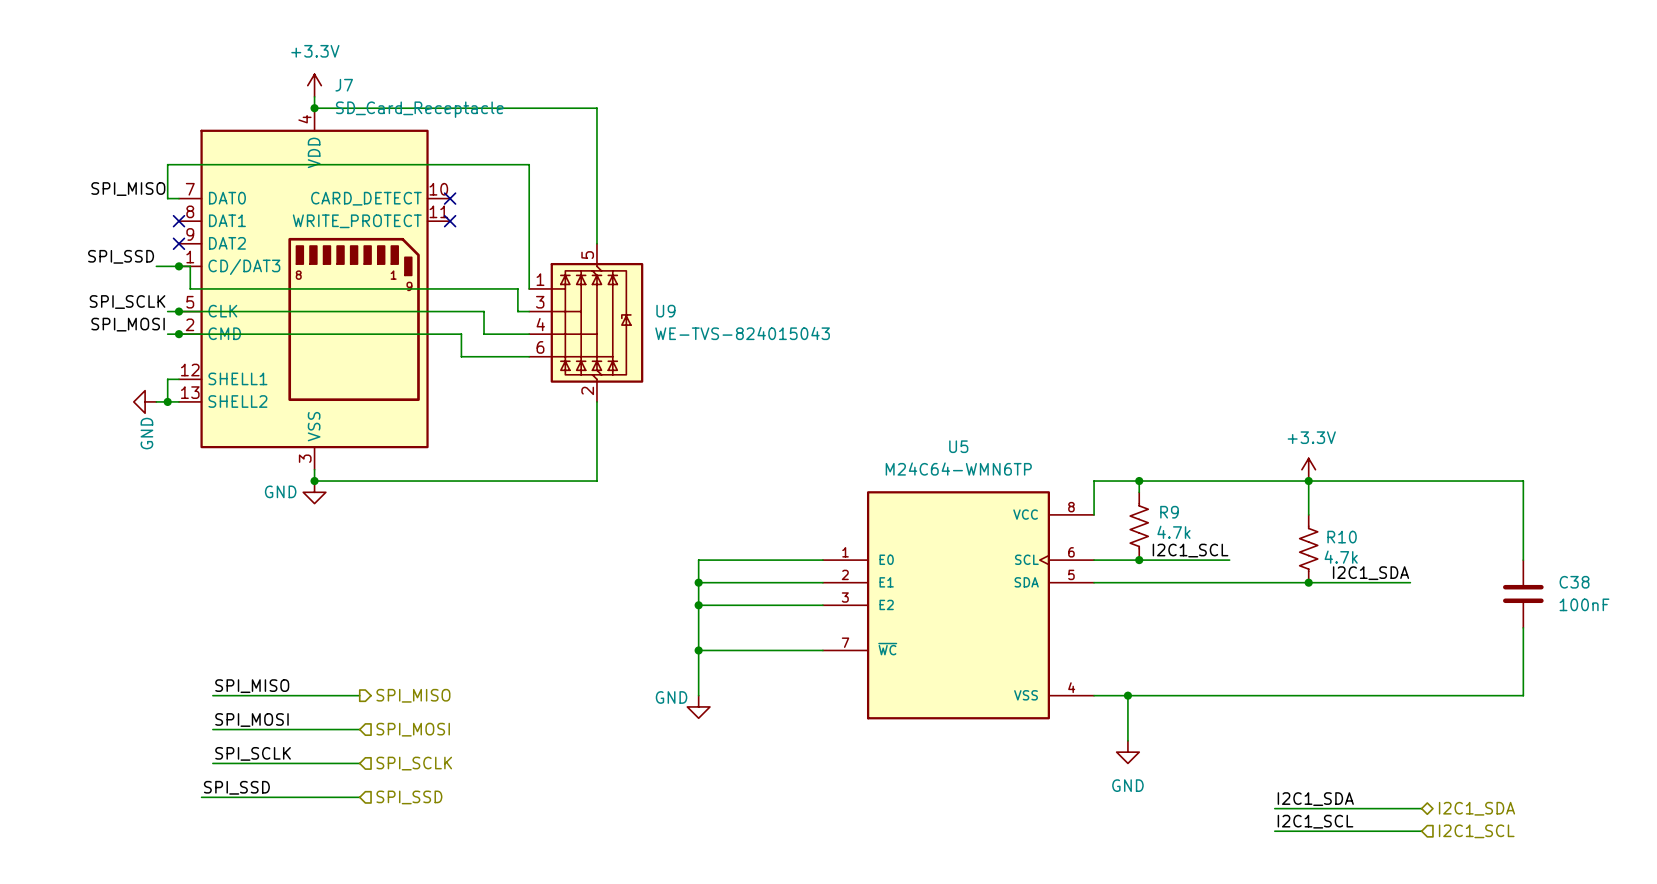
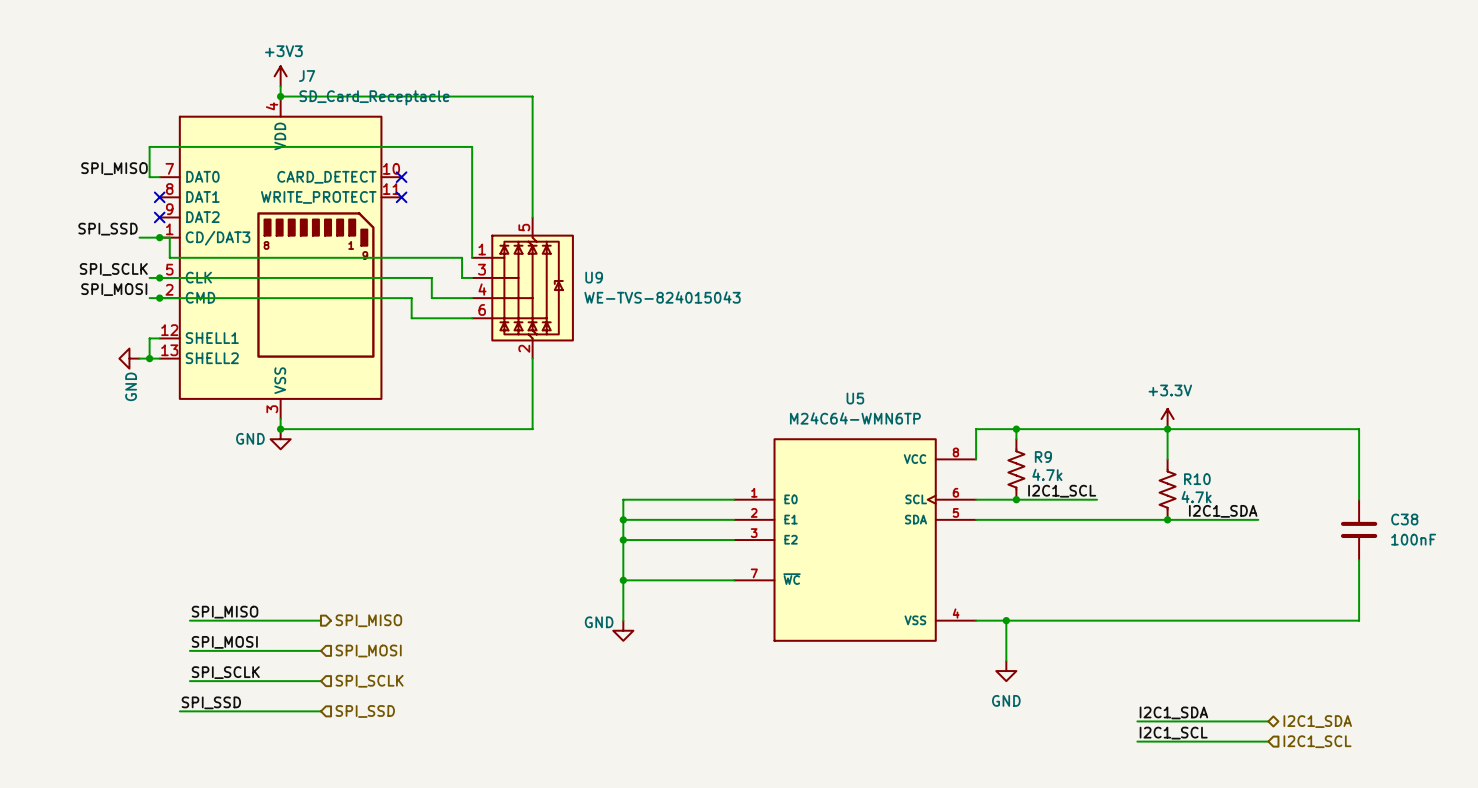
power symbol: +3.3V (314, 85) -> +3V3 (280, 76)

